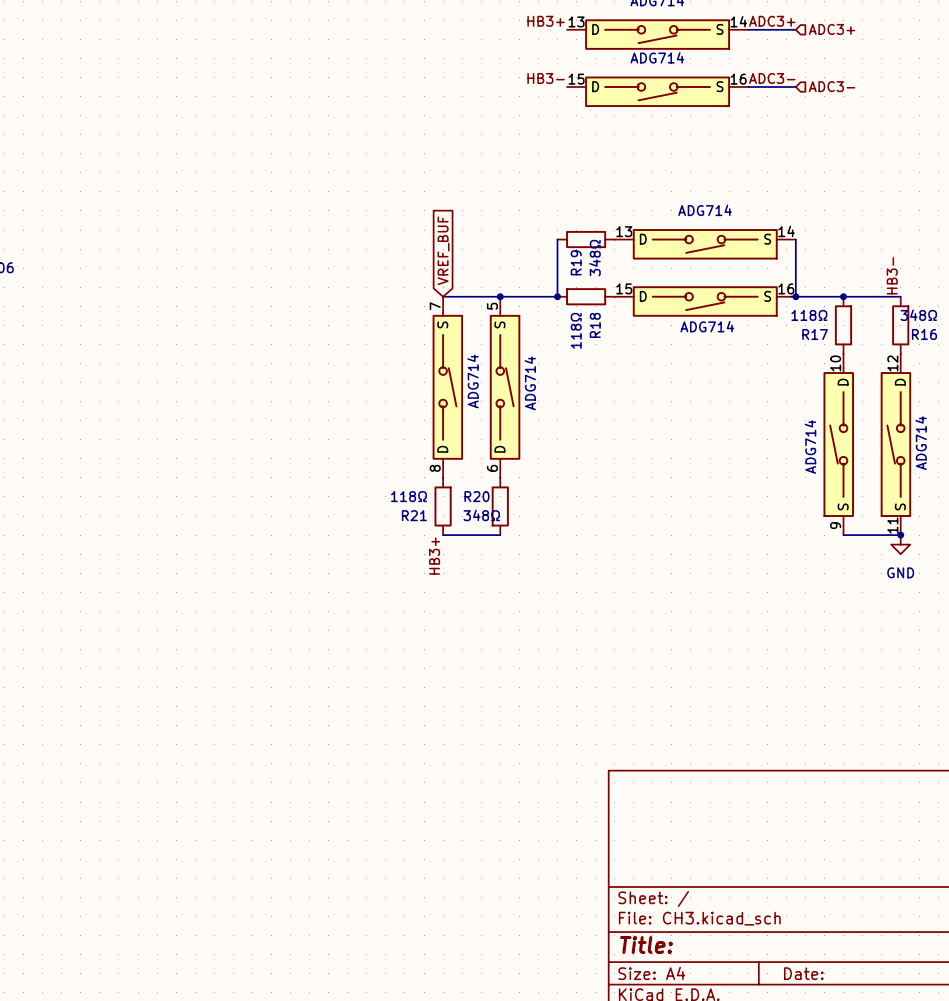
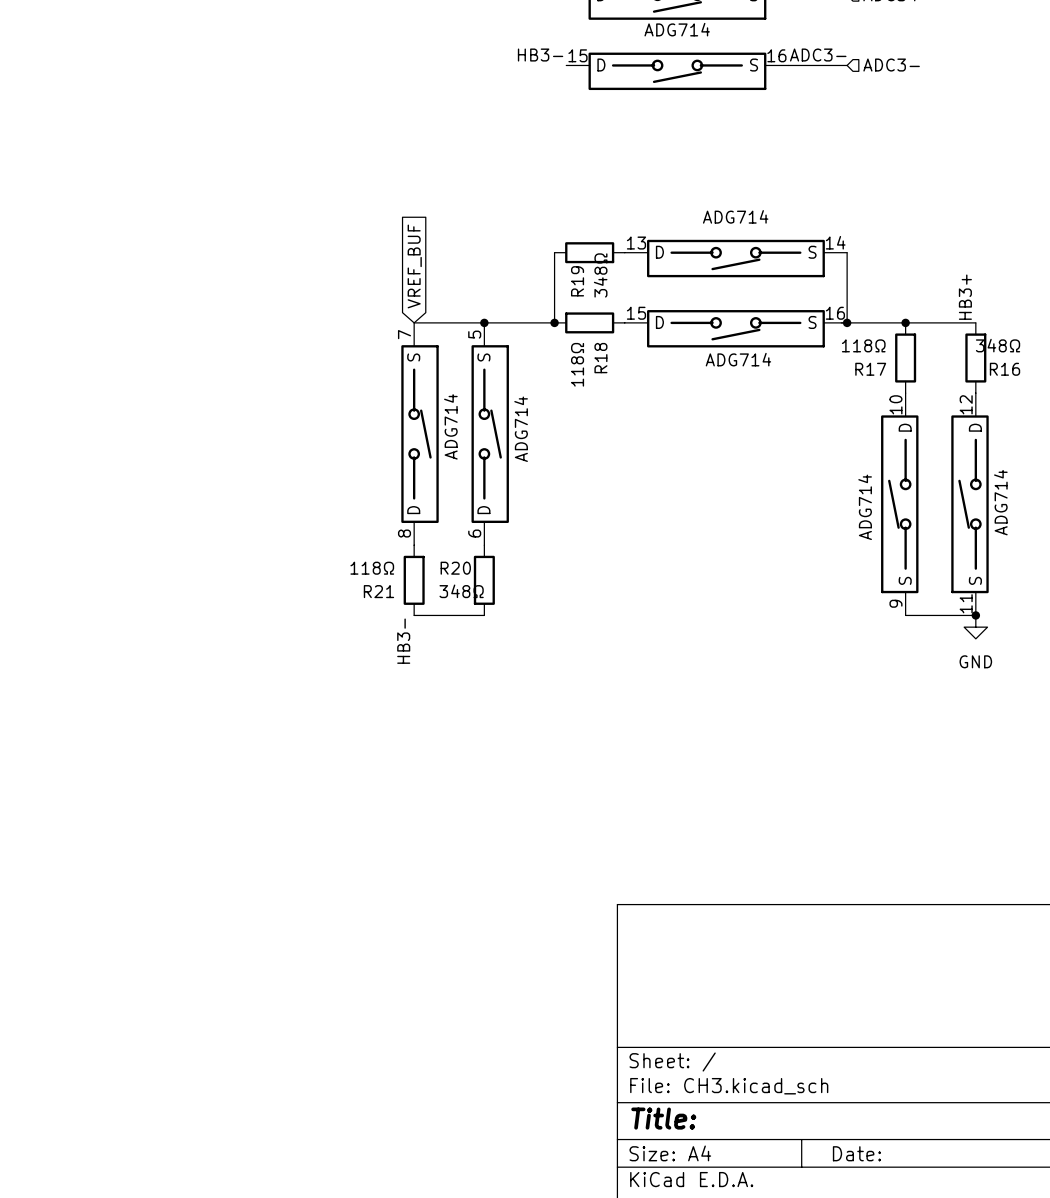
label: HB3- (892, 275) -> HB3+ (965, 297)
label: HB3+ (434, 556) -> HB3- (403, 641)

